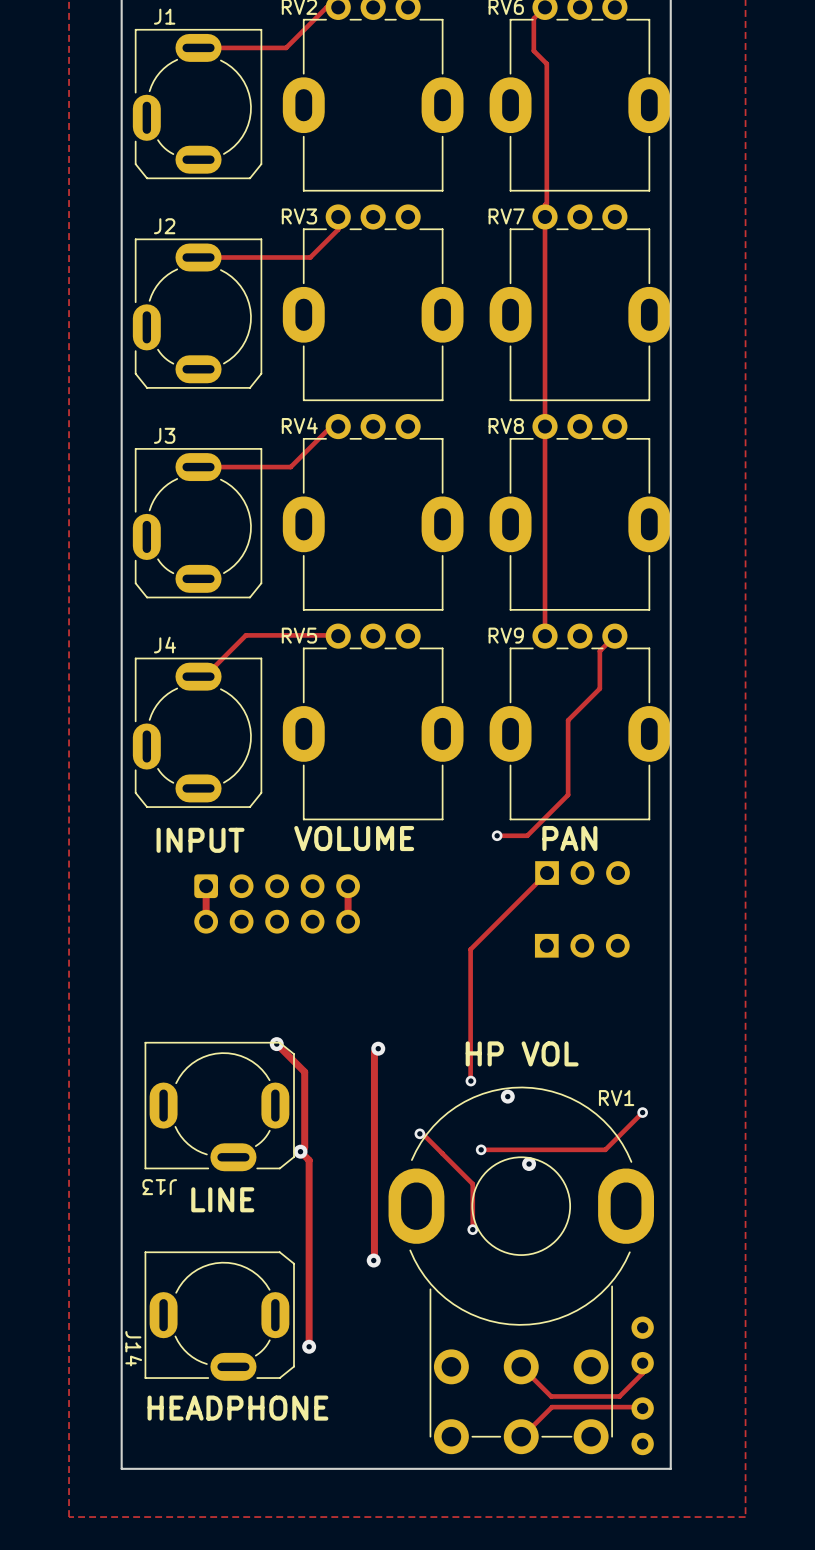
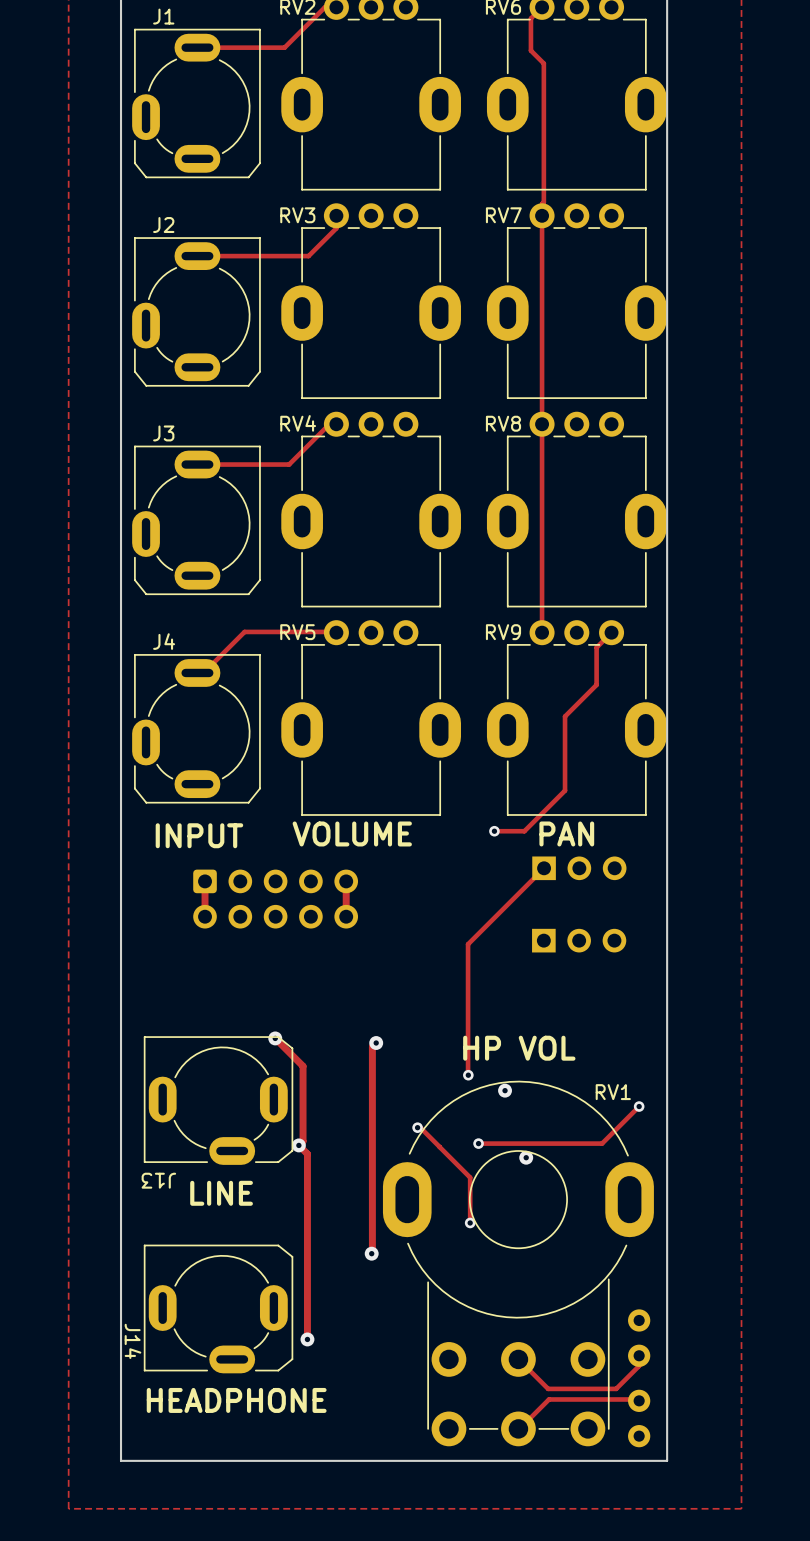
RV1 footprint: [388, 1086, 654, 1455] -> [382, 1080, 654, 1447]

